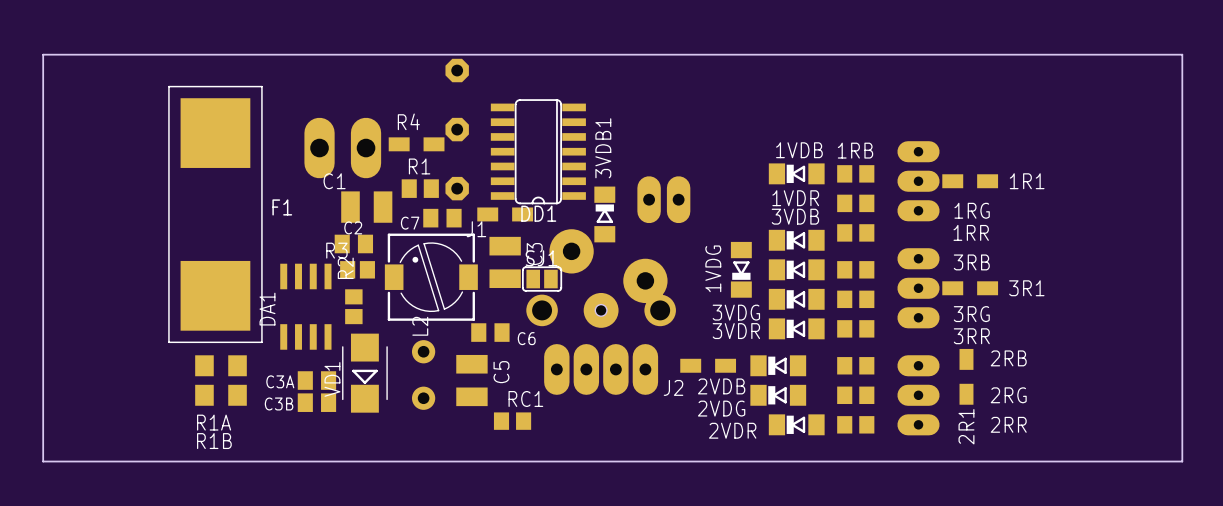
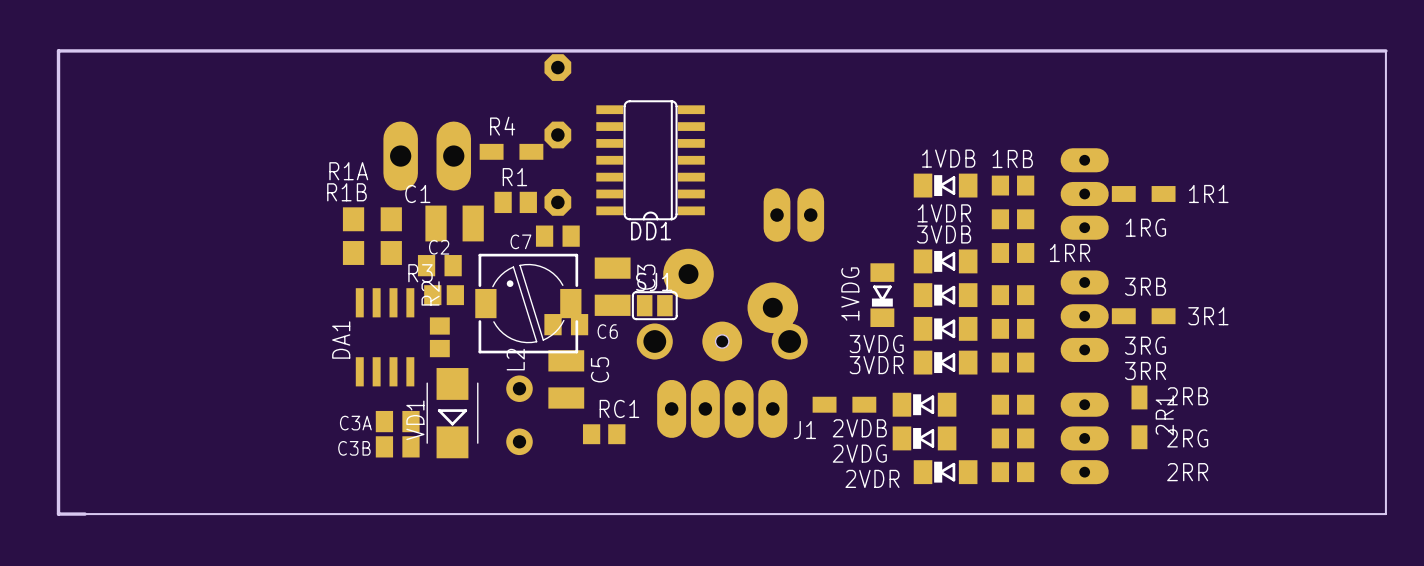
board edge: (1182, 55) (43, 54) (43, 461) -> (1385, 50) (58, 50) (58, 514) (85, 514)
F1: (215, 214) -> none
J1: (505, 214) -> none
3VDB1: (604, 214) -> none
C7 position: (442, 218) -> (557, 236)
1RR name position: 1RR (971, 232) -> 1RR (1070, 252)
C6 position: (490, 332) -> (566, 324)
R1A position: (220, 365) -> (372, 219)
C5 position: (471, 380) -> (566, 379)
J2 name: J2 (673, 387) -> J1 (804, 430)
R1B position: (220, 395) -> (372, 252)
RC1 position: (512, 421) -> (604, 434)
R1A name position: R1A (214, 422) -> R1A (348, 171)
2R1 name position: 2R1 (966, 426) -> 2R1 (1164, 415)
R1B name position: R1B (214, 441) -> R1B (346, 192)

